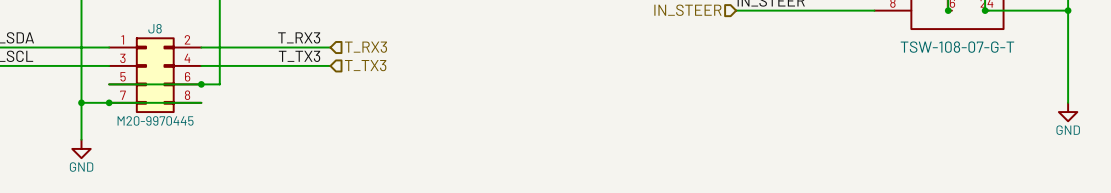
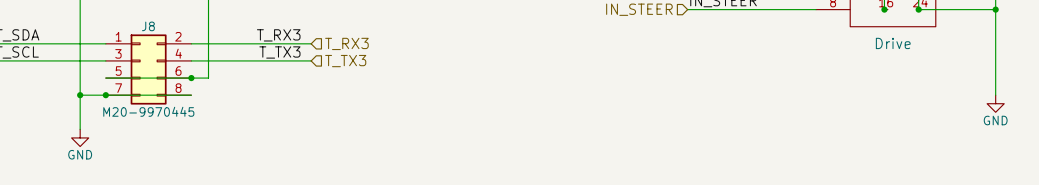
part value: TSW-108-07-G-T (957, 47) -> Drive (893, 43)

